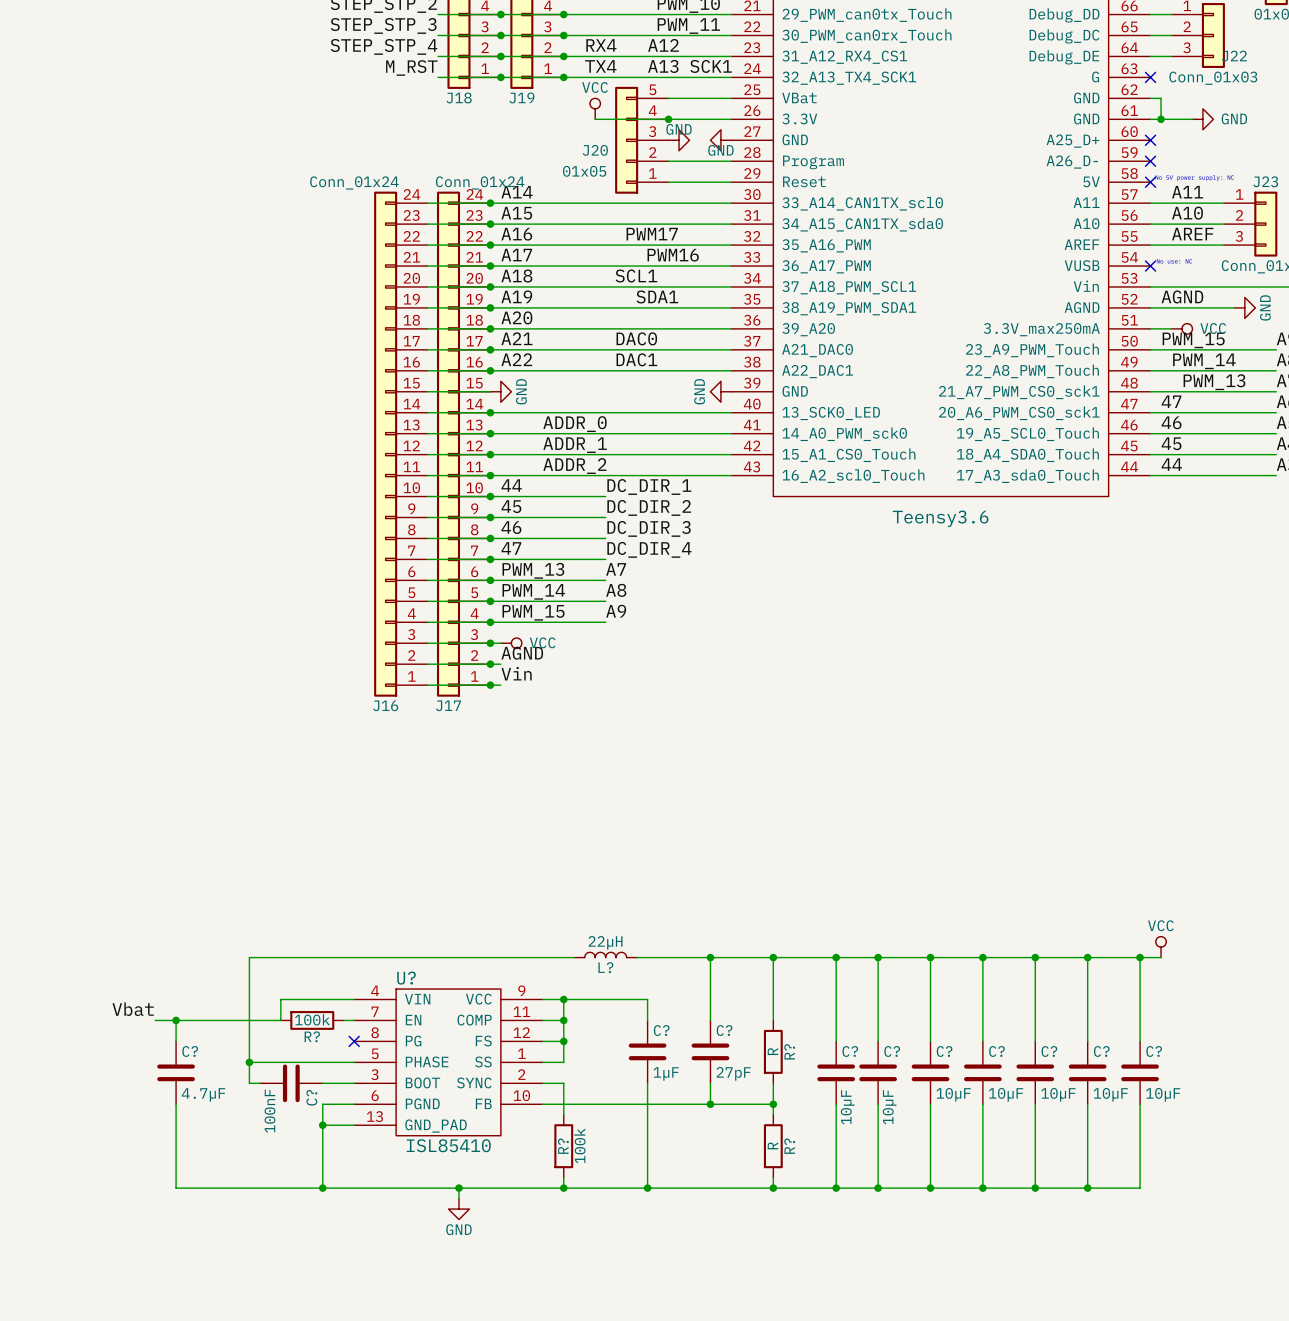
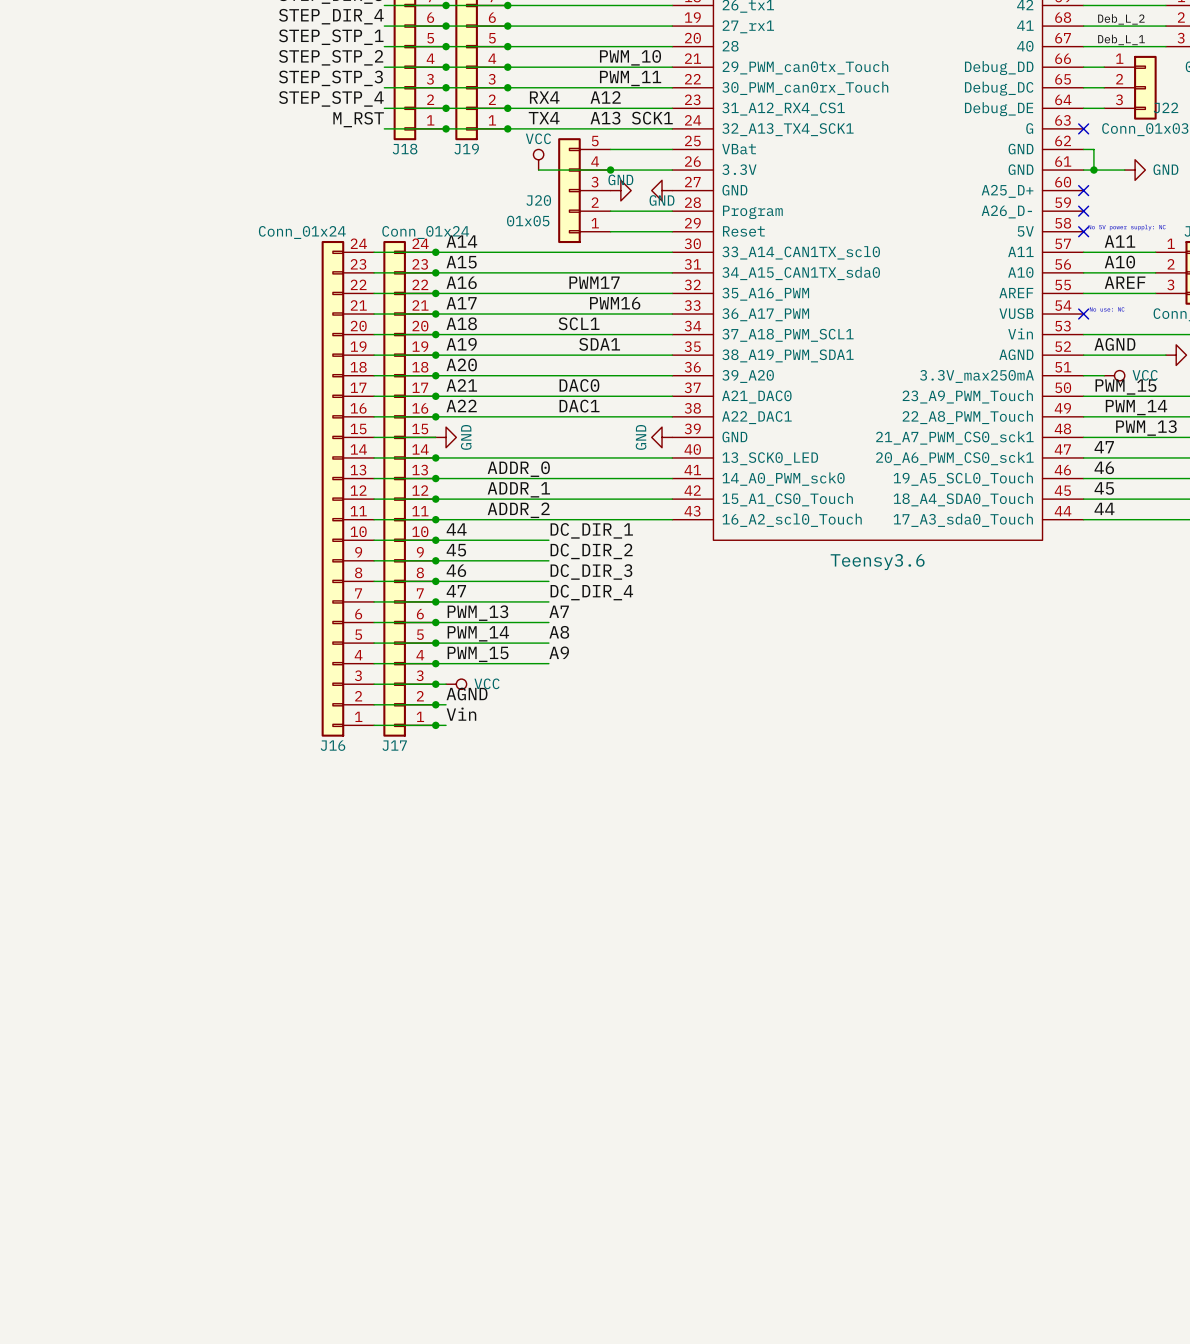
power symbol: VCC (1161, 947) -> none
L?: 22µH (605, 954) -> none
wire: (574, 957) (249, 957) (249, 1083) (259, 1083) -> none
wire: (637, 957) (1161, 957) -> none
wire: (710, 957) (710, 1020) -> none
junction: (710, 957) -> none
wire: (773, 957) (773, 1020) -> none
junction: (773, 957) -> none
wire: (836, 957) (836, 1041) -> none
junction: (836, 957) -> none
wire: (878, 957) (878, 1041) -> none
junction: (878, 957) -> none
wire: (930, 957) (930, 1041) -> none
junction: (930, 957) -> none
wire: (982, 957) (982, 1041) -> none
junction: (982, 957) -> none
wire: (1035, 957) (1035, 1041) -> none
junction: (1035, 957) -> none
wire: (1087, 957) (1087, 1041) -> none
junction: (1087, 957) -> none
wire: (1140, 957) (1140, 1041) -> none
junction: (1140, 957) -> none
wire: (354, 999) (280, 999) (280, 1020) (155, 1020) -> none
wire: (542, 999) (647, 999) (647, 1020) -> none
wire: (563, 999) (563, 1062) (542, 1062) -> none
junction: (563, 999) -> none
label: Vbat (133, 1009) -> none
wire: (176, 1020) (176, 1041) -> none
junction: (176, 1020) -> none
R?: 100k (312, 1020) -> none
wire: (343, 1020) (354, 1020) -> none
wire: (542, 1020) (563, 1020) -> none
junction: (563, 1020) -> none
no-connect mark: (354, 1041) -> none
wire: (542, 1041) (563, 1041) -> none
junction: (563, 1041) -> none
C?: 1µF (647, 1051) -> none
C?: 27pF (710, 1051) -> none
R?: R (773, 1051) -> none
wire: (249, 1062) (354, 1062) -> none
junction: (249, 1062) -> none
U?: ISL85410 (448, 1062) -> none
C?: 4.7µF (176, 1072) -> none
C?: 10µF (836, 1072) -> none
C?: 10µF (878, 1072) -> none
C?: 10µF (930, 1072) -> none
C?: 10µF (982, 1072) -> none
C?: 10µF (1035, 1072) -> none
C?: 10µF (1087, 1072) -> none
C?: 10µF (1140, 1072) -> none
C?: 100nF (291, 1083) -> none
wire: (322, 1083) (354, 1083) -> none
wire: (542, 1083) (563, 1083) (563, 1114) -> none
wire: (647, 1083) (647, 1188) -> none
wire: (710, 1083) (710, 1104) -> none
wire: (773, 1083) (773, 1114) -> none
wire: (176, 1104) (176, 1188) (1140, 1188) (1140, 1104) -> none
wire: (354, 1104) (322, 1104) (322, 1188) -> none
wire: (542, 1104) (773, 1104) -> none
junction: (710, 1104) -> none
junction: (773, 1104) -> none
wire: (836, 1104) (836, 1188) -> none
wire: (878, 1104) (878, 1188) -> none
wire: (930, 1104) (930, 1188) -> none
wire: (982, 1104) (982, 1188) -> none
wire: (1035, 1104) (1035, 1188) -> none
wire: (1087, 1104) (1087, 1188) -> none
wire: (322, 1125) (354, 1125) -> none
junction: (322, 1125) -> none
100k: R? (563, 1146) -> none
R?: R (773, 1146) -> none
wire: (563, 1177) (563, 1188) -> none
wire: (773, 1177) (773, 1188) -> none
junction: (322, 1188) -> none
wire: (458, 1188) (458, 1198) -> none
junction: (458, 1188) -> none
junction: (563, 1188) -> none
junction: (647, 1188) -> none
junction: (773, 1188) -> none
junction: (836, 1188) -> none
junction: (878, 1188) -> none
junction: (930, 1188) -> none
junction: (982, 1188) -> none
junction: (1035, 1188) -> none
junction: (1087, 1188) -> none
power symbol: GND (458, 1209) -> none

